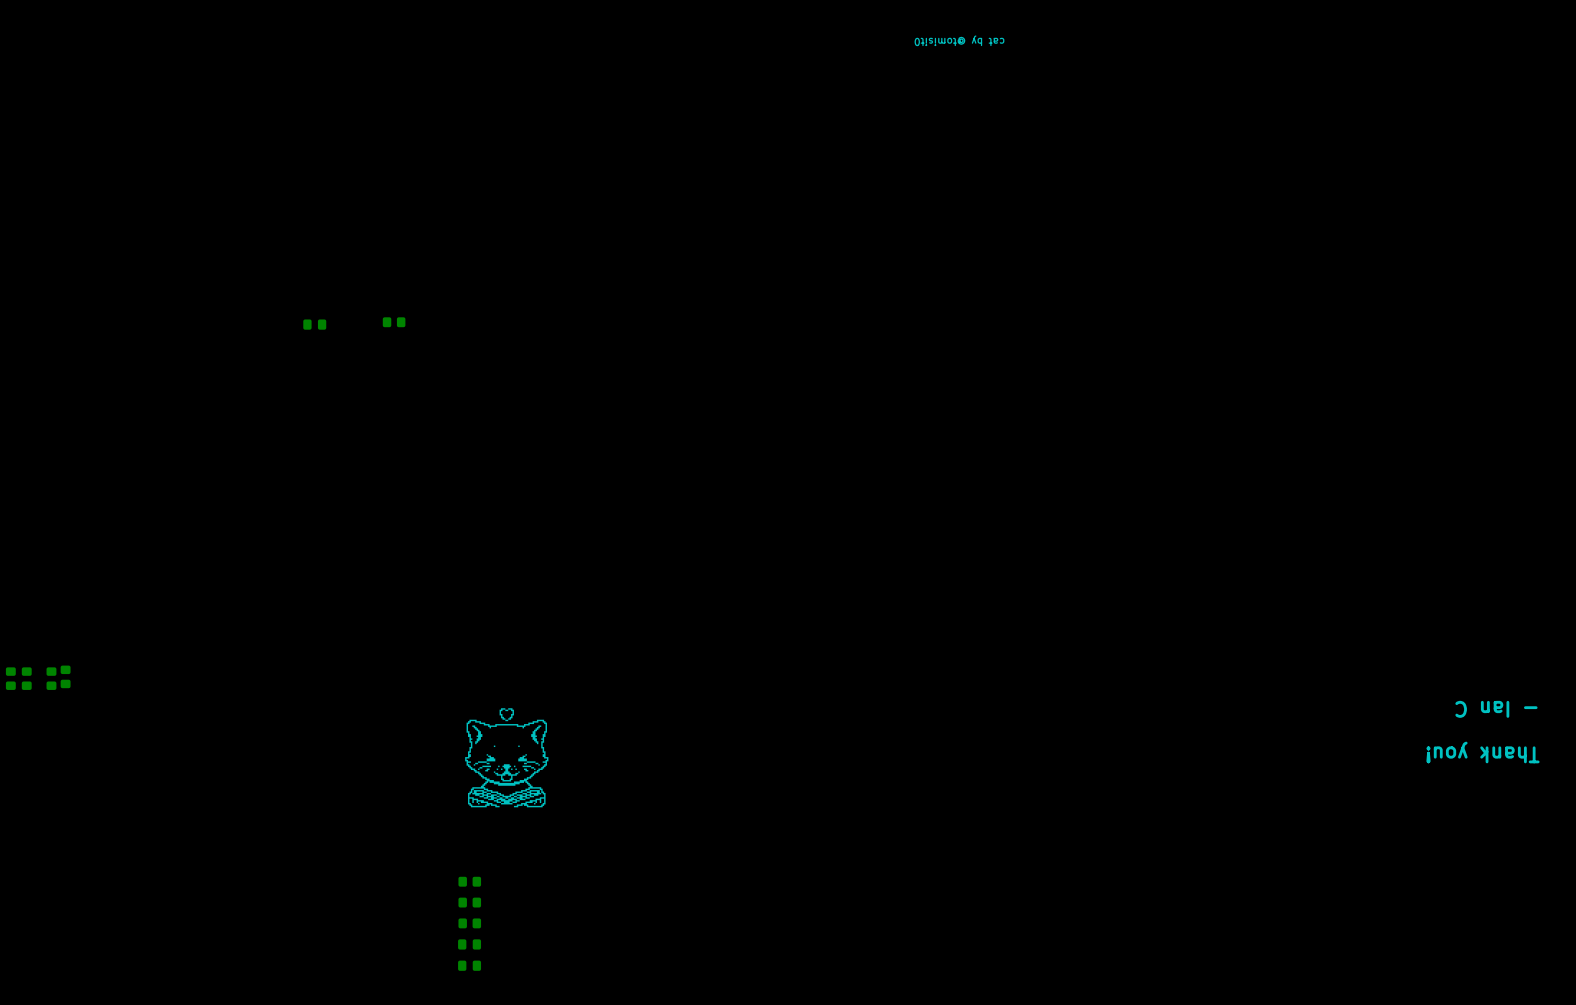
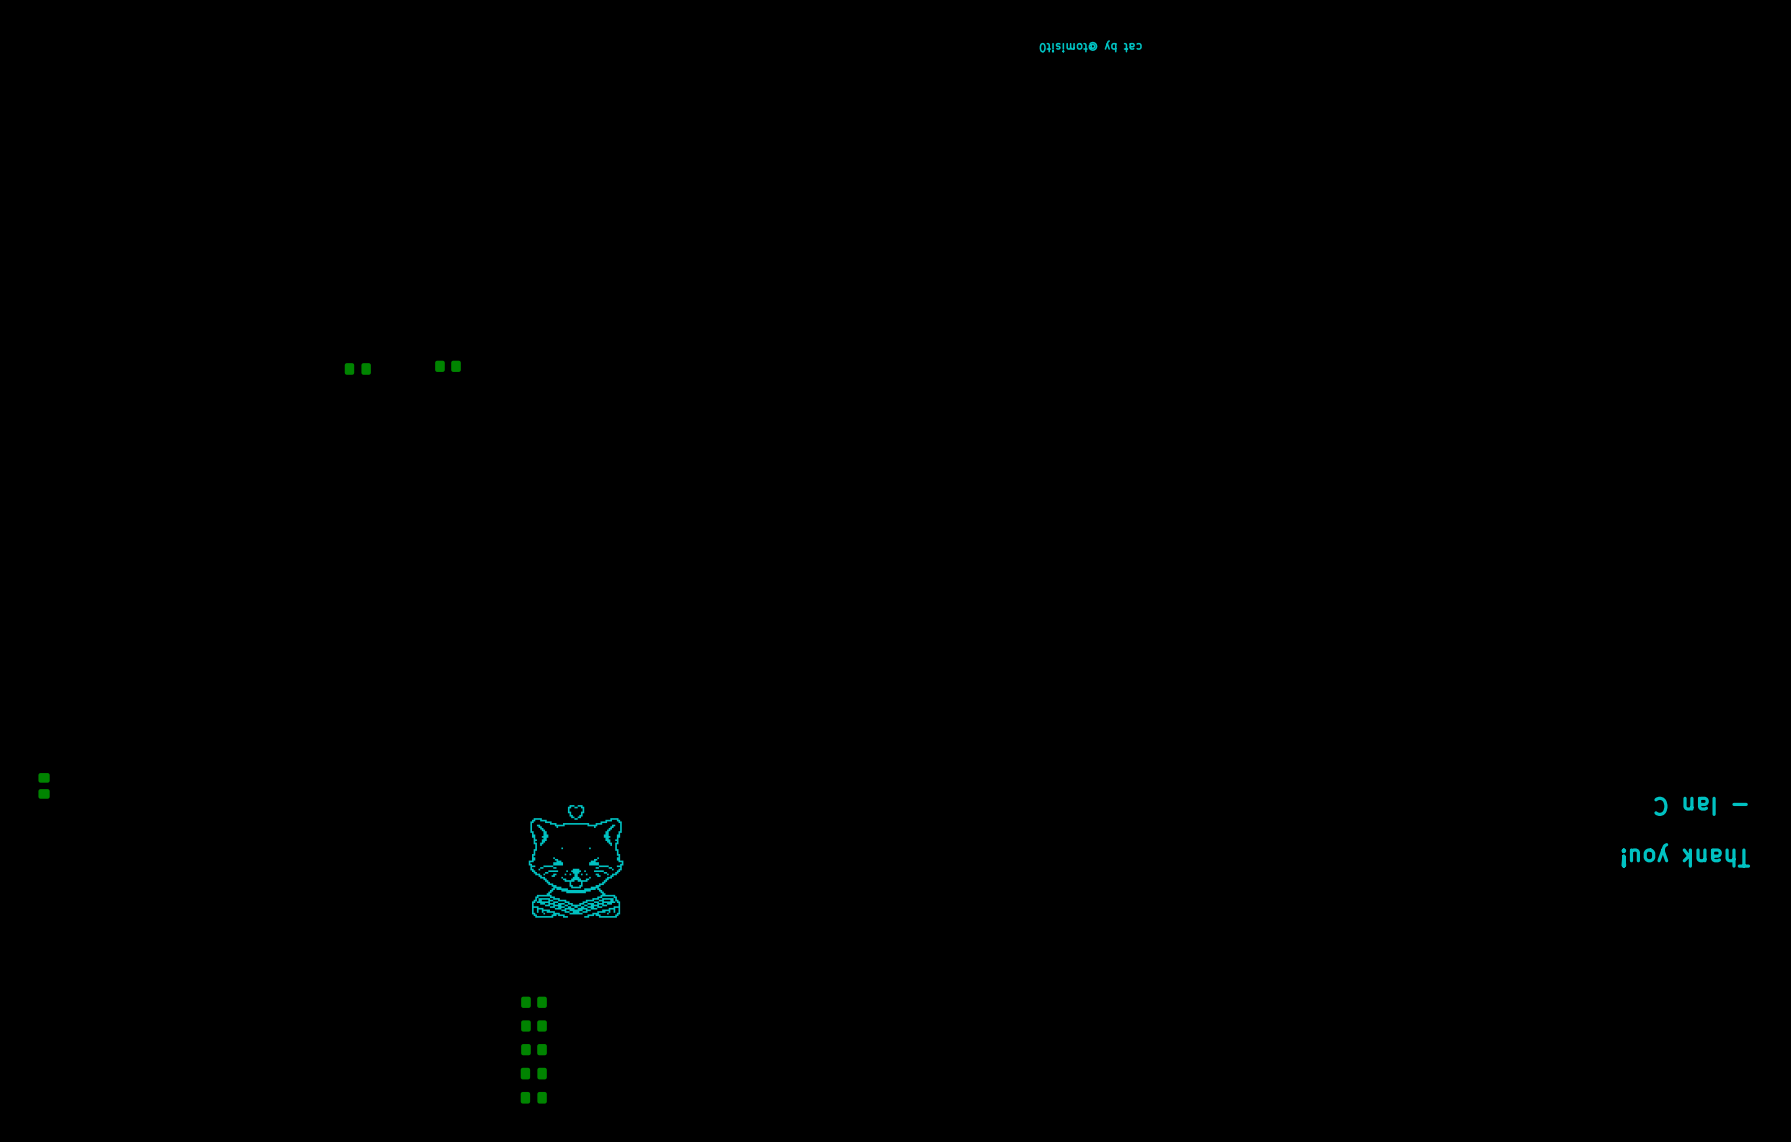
part: (65, 676) -> none
part: (10, 678) -> none
part: (26, 678) -> none
part: (51, 678) -> none
part: none -> (44, 785)

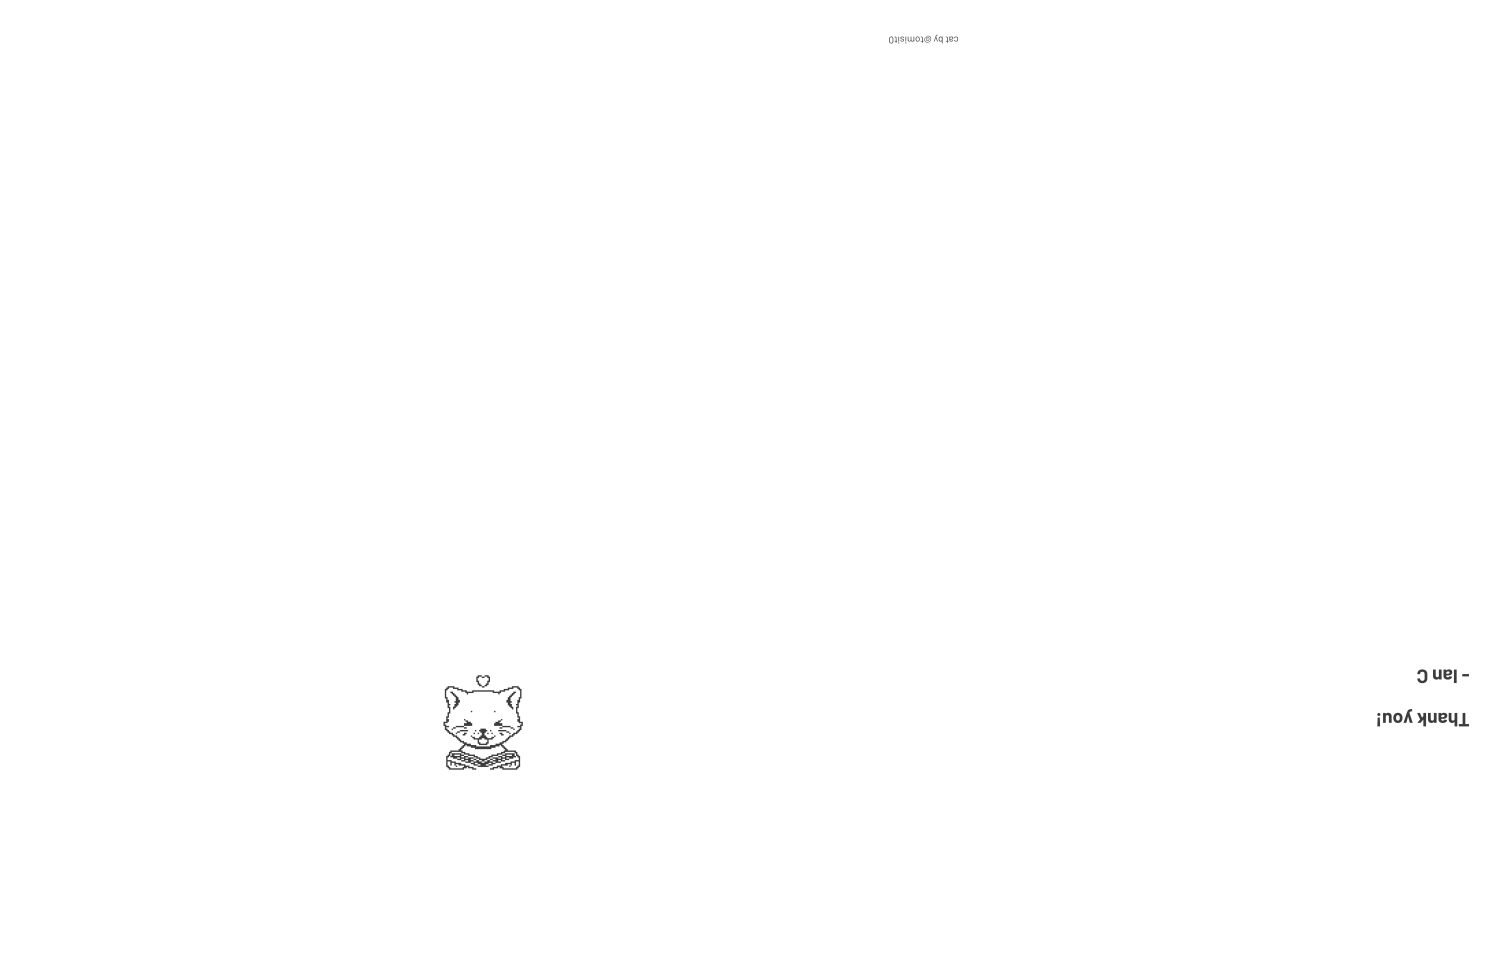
part: (447, 366) -> none
part: (357, 368) -> none
part: (44, 785) -> none
part: (533, 1002) -> none
part: (533, 1025) -> none
part: (533, 1049) -> none
part: (533, 1073) -> none
part: (533, 1097) -> none

